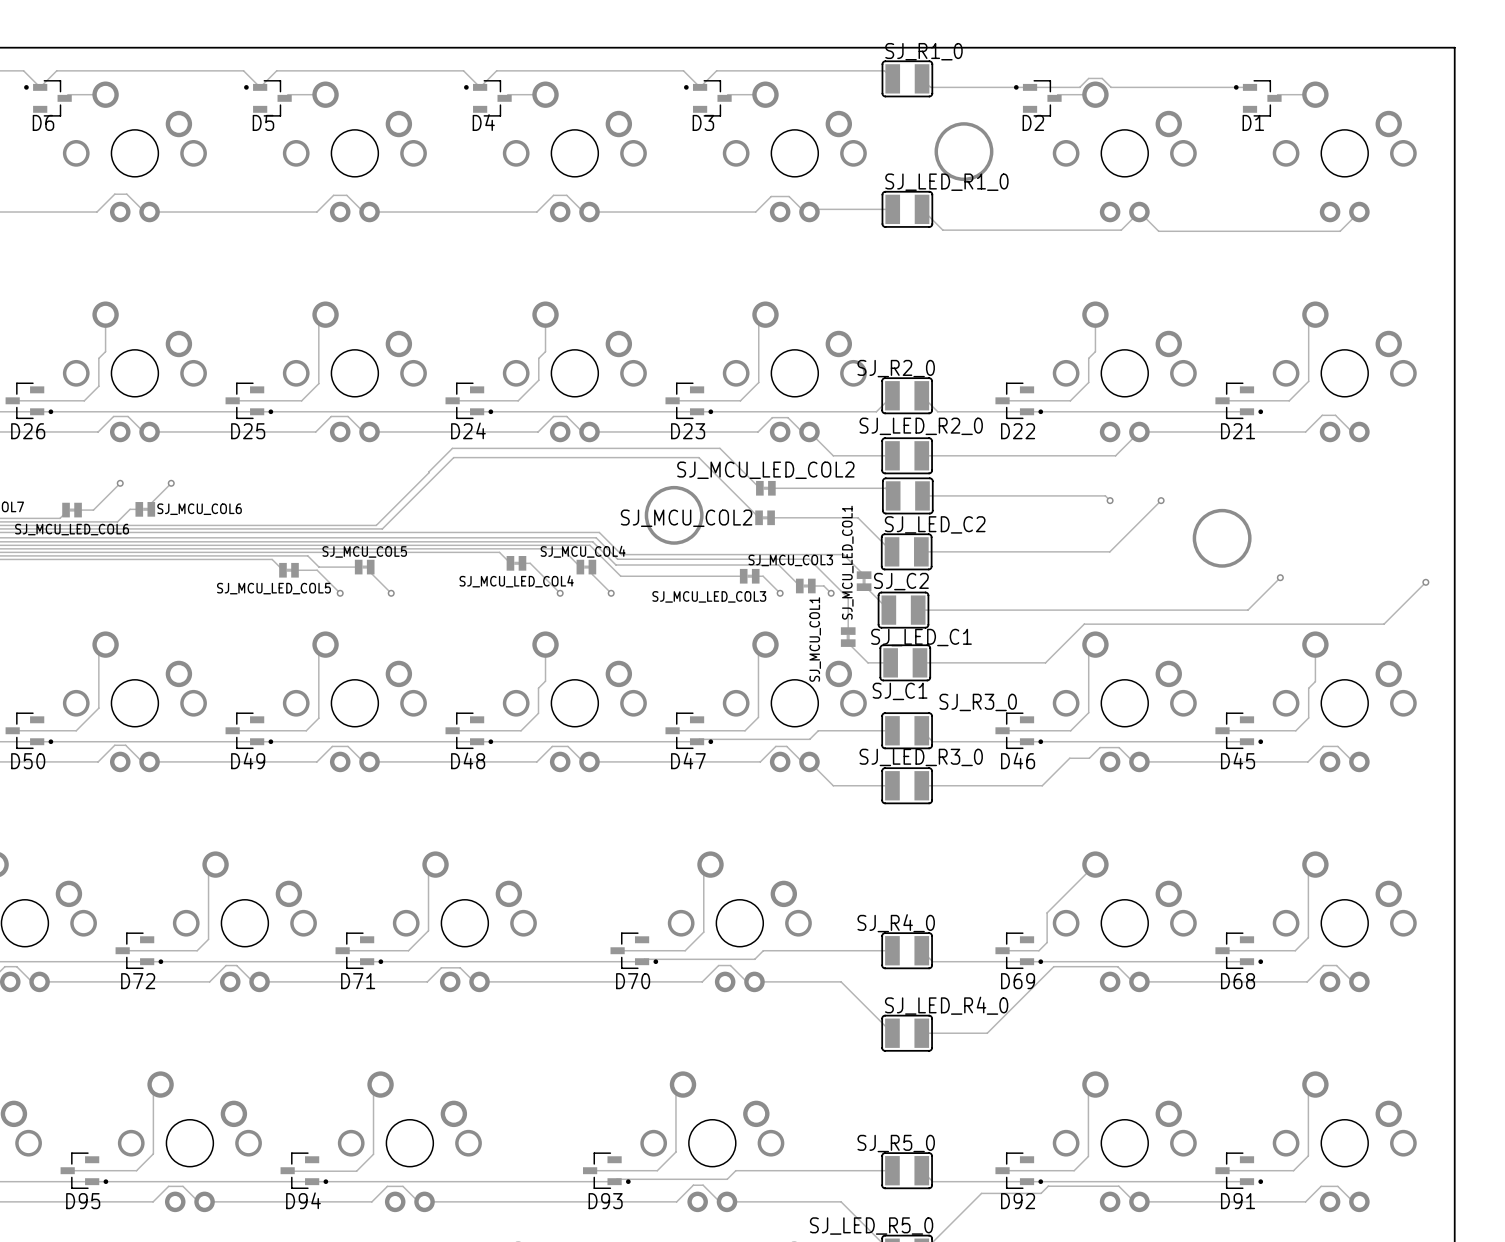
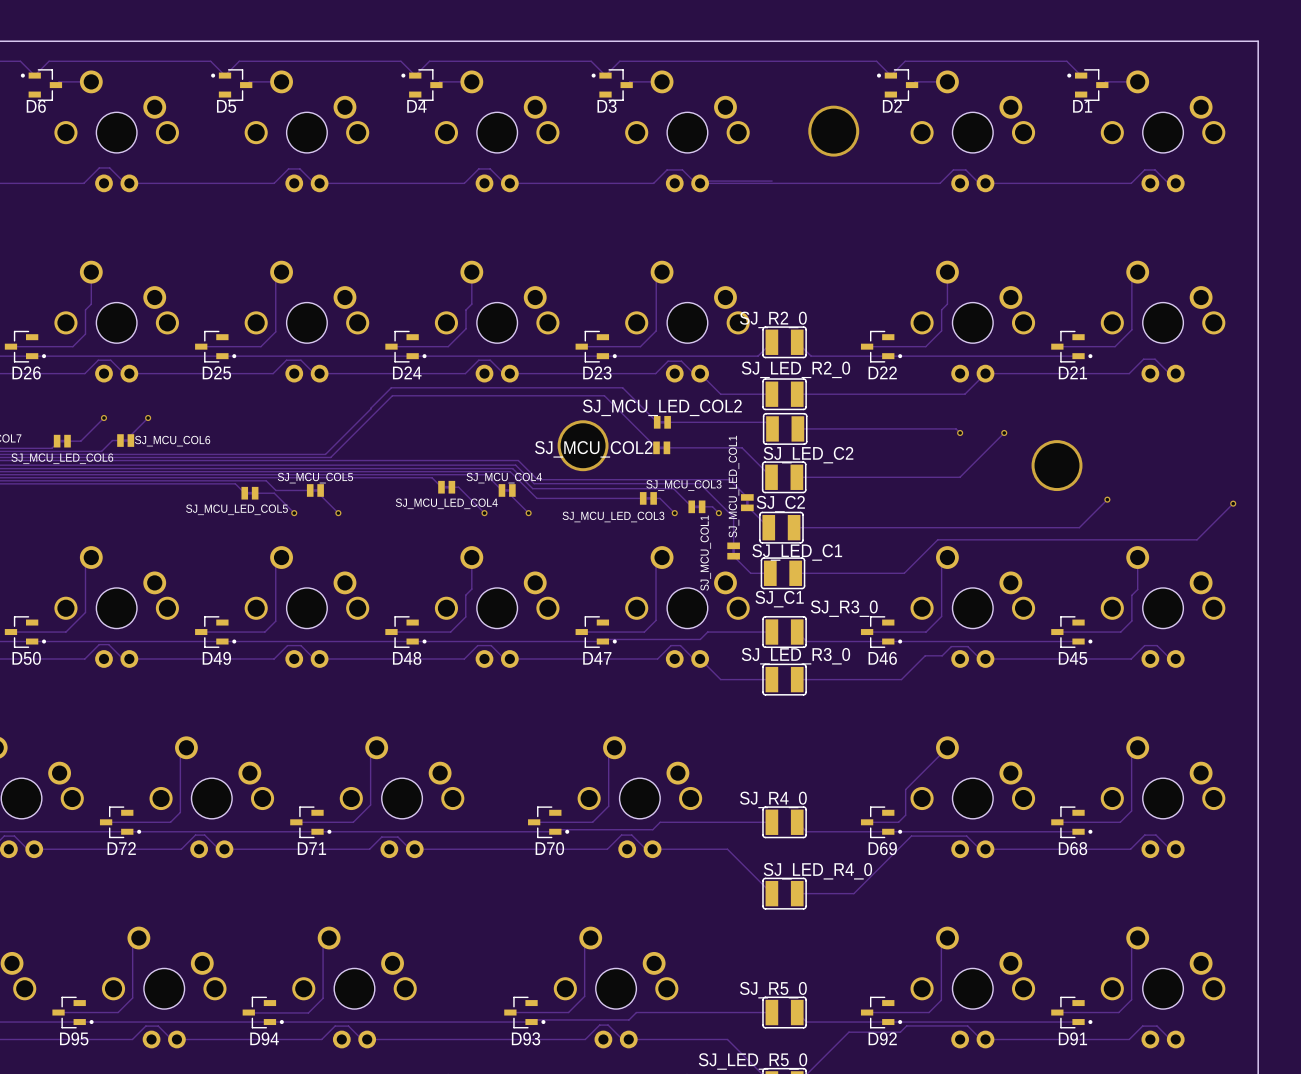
SJ_R1_0: (907, 78) -> none
track: (922, 78) (930, 87) (1079, 87) (1088, 78) (1102, 78) (1111, 87) (1250, 87) -> (765, 61) (876, 61) (890, 75) (905, 61) (1066, 61) (1081, 75)
SJ_LED_R1_0: (907, 209) -> none
track: (922, 209) (942, 230) (1121, 230) (1139, 212) (1158, 231) (1340, 231) (1359, 212) -> (700, 183) (940, 183) (953, 169) (965, 169) (979, 183) (1131, 183) (1144, 169) (1155, 169) (1168, 183) (1175, 183)

